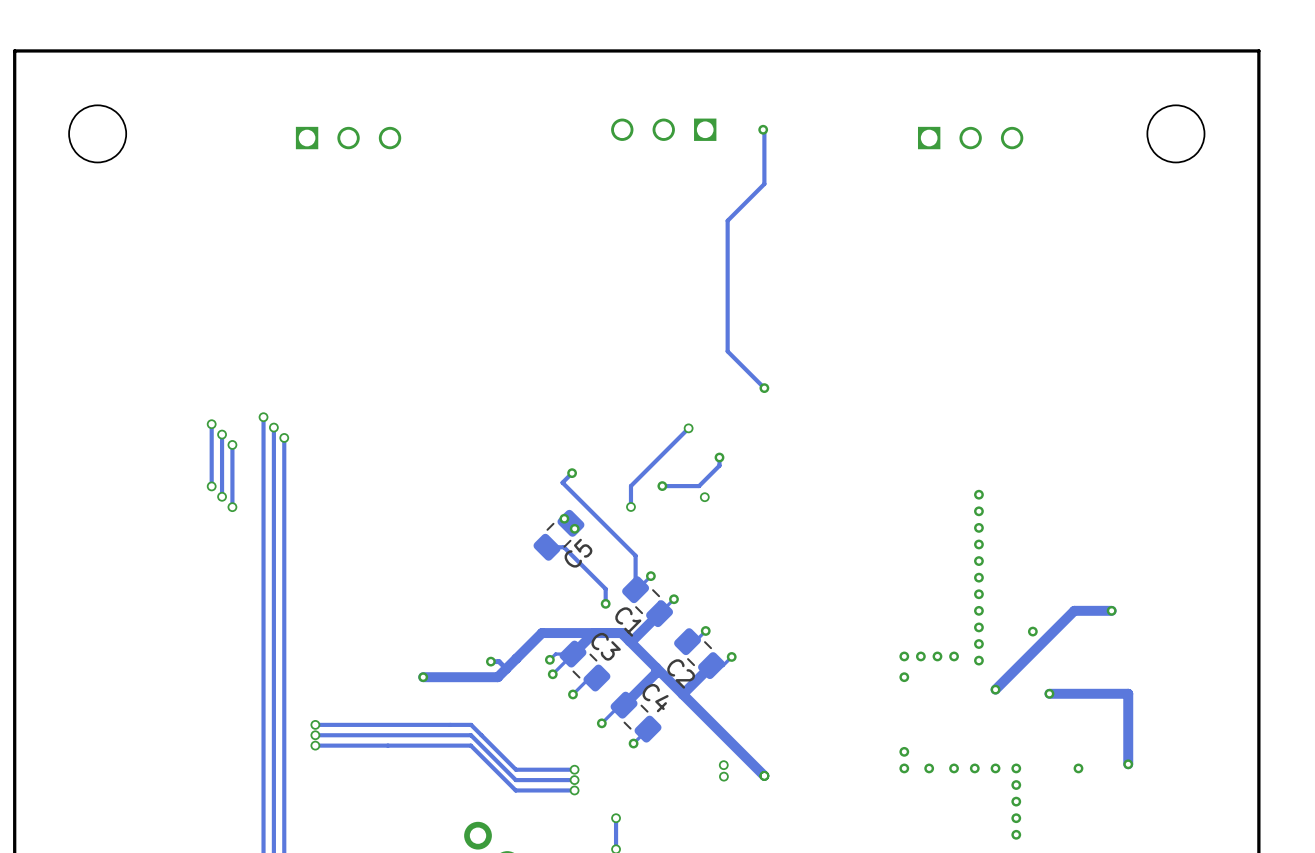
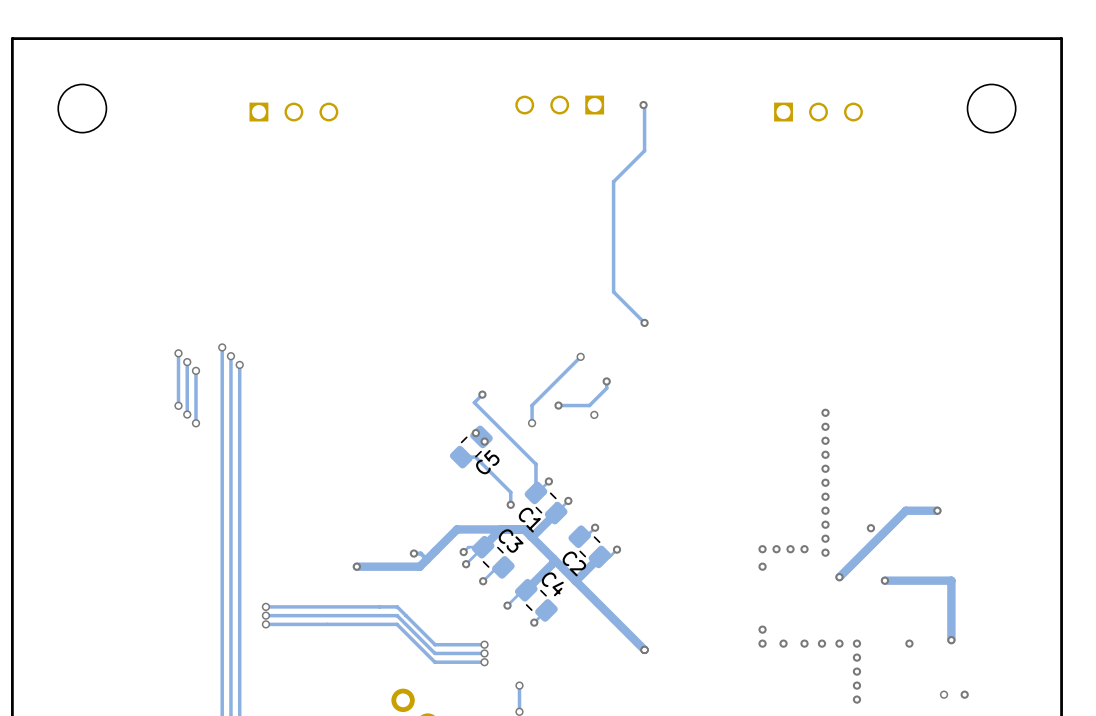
via: (723, 765) -> none
via: (723, 776) -> none
via: none -> (944, 694)
via: none -> (964, 694)

